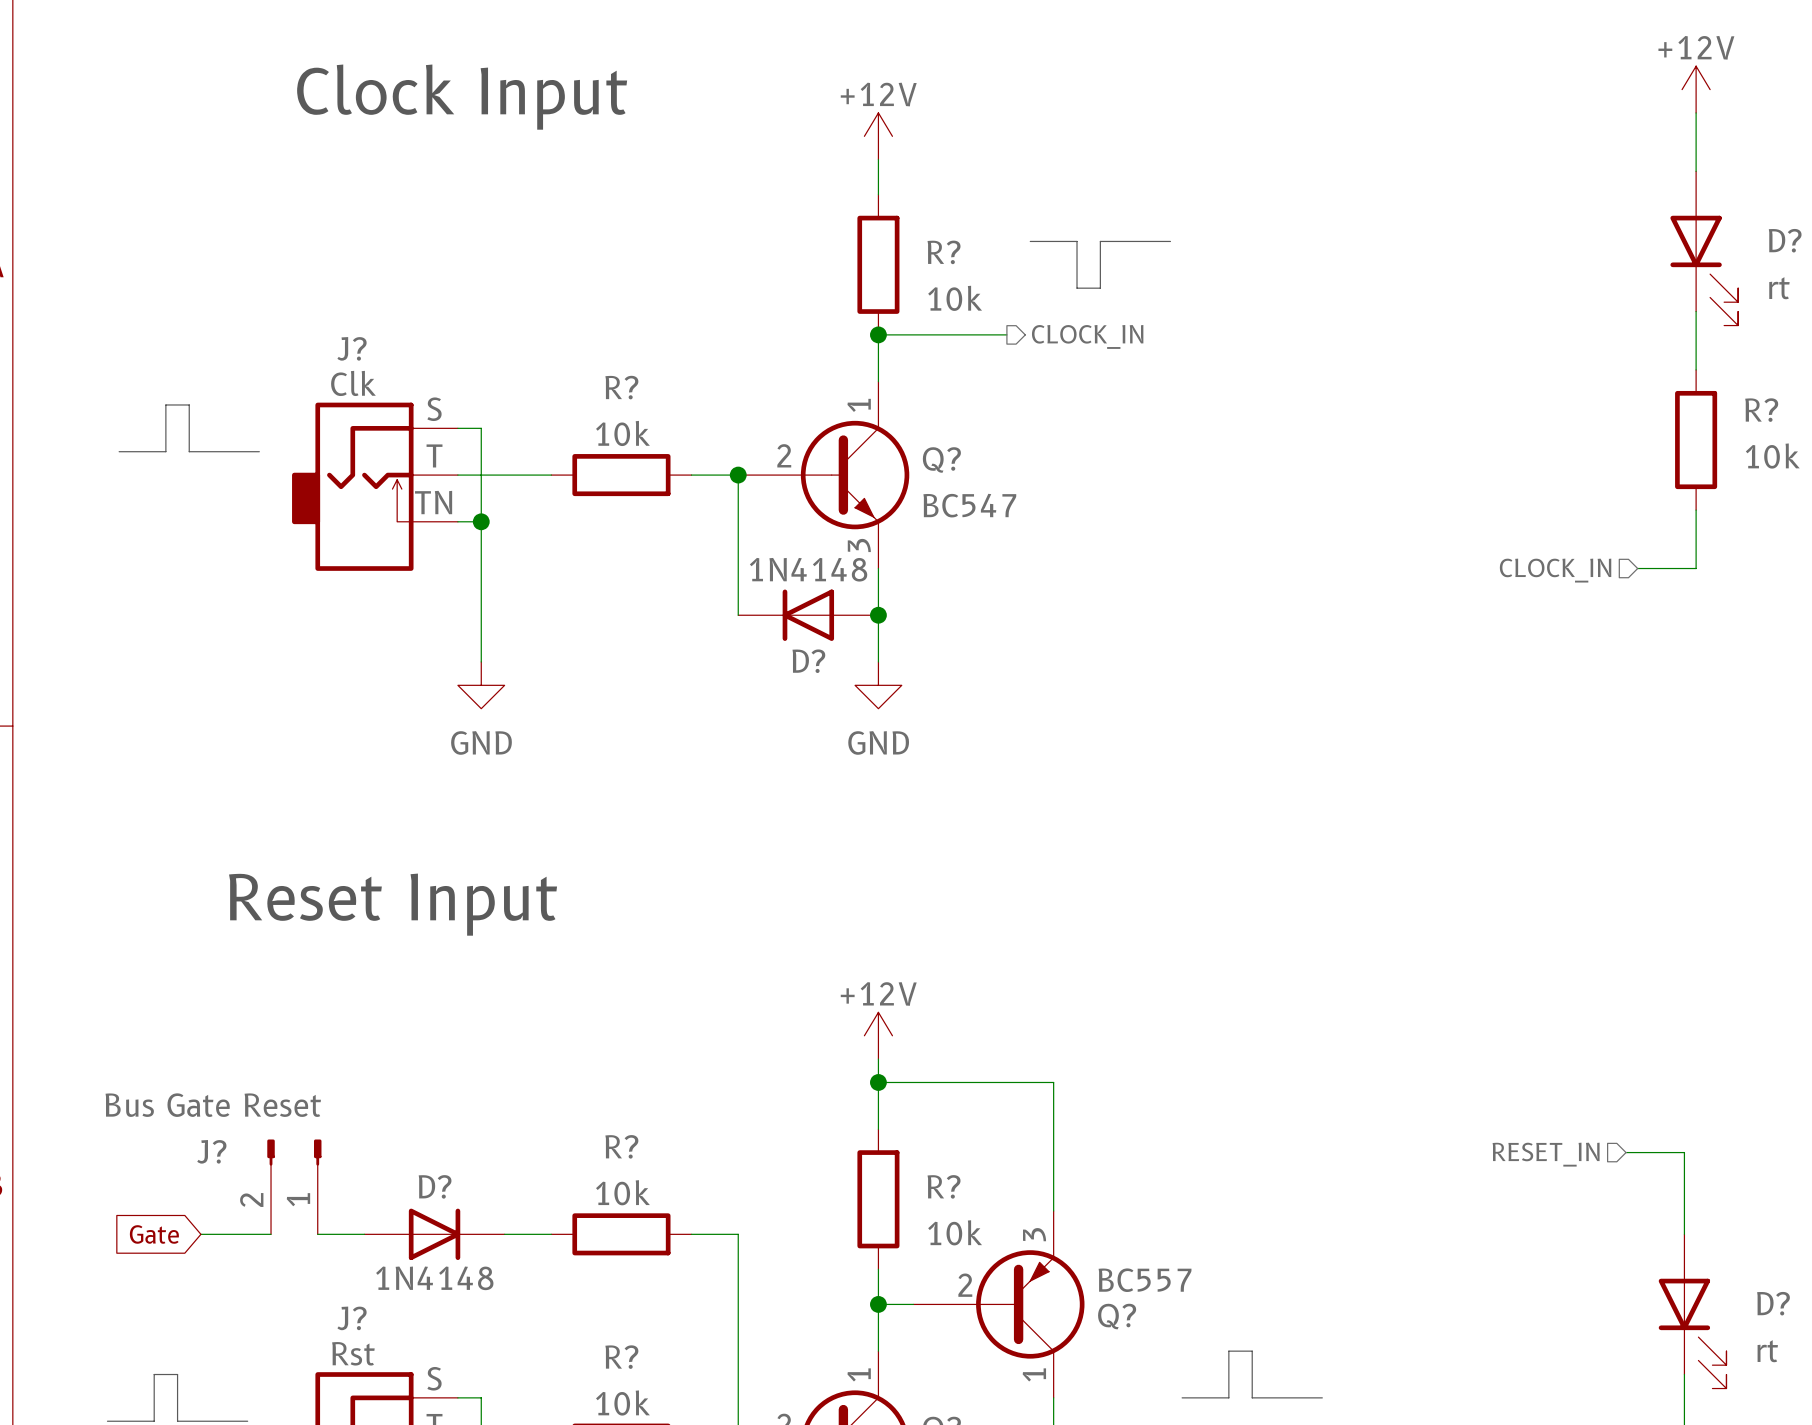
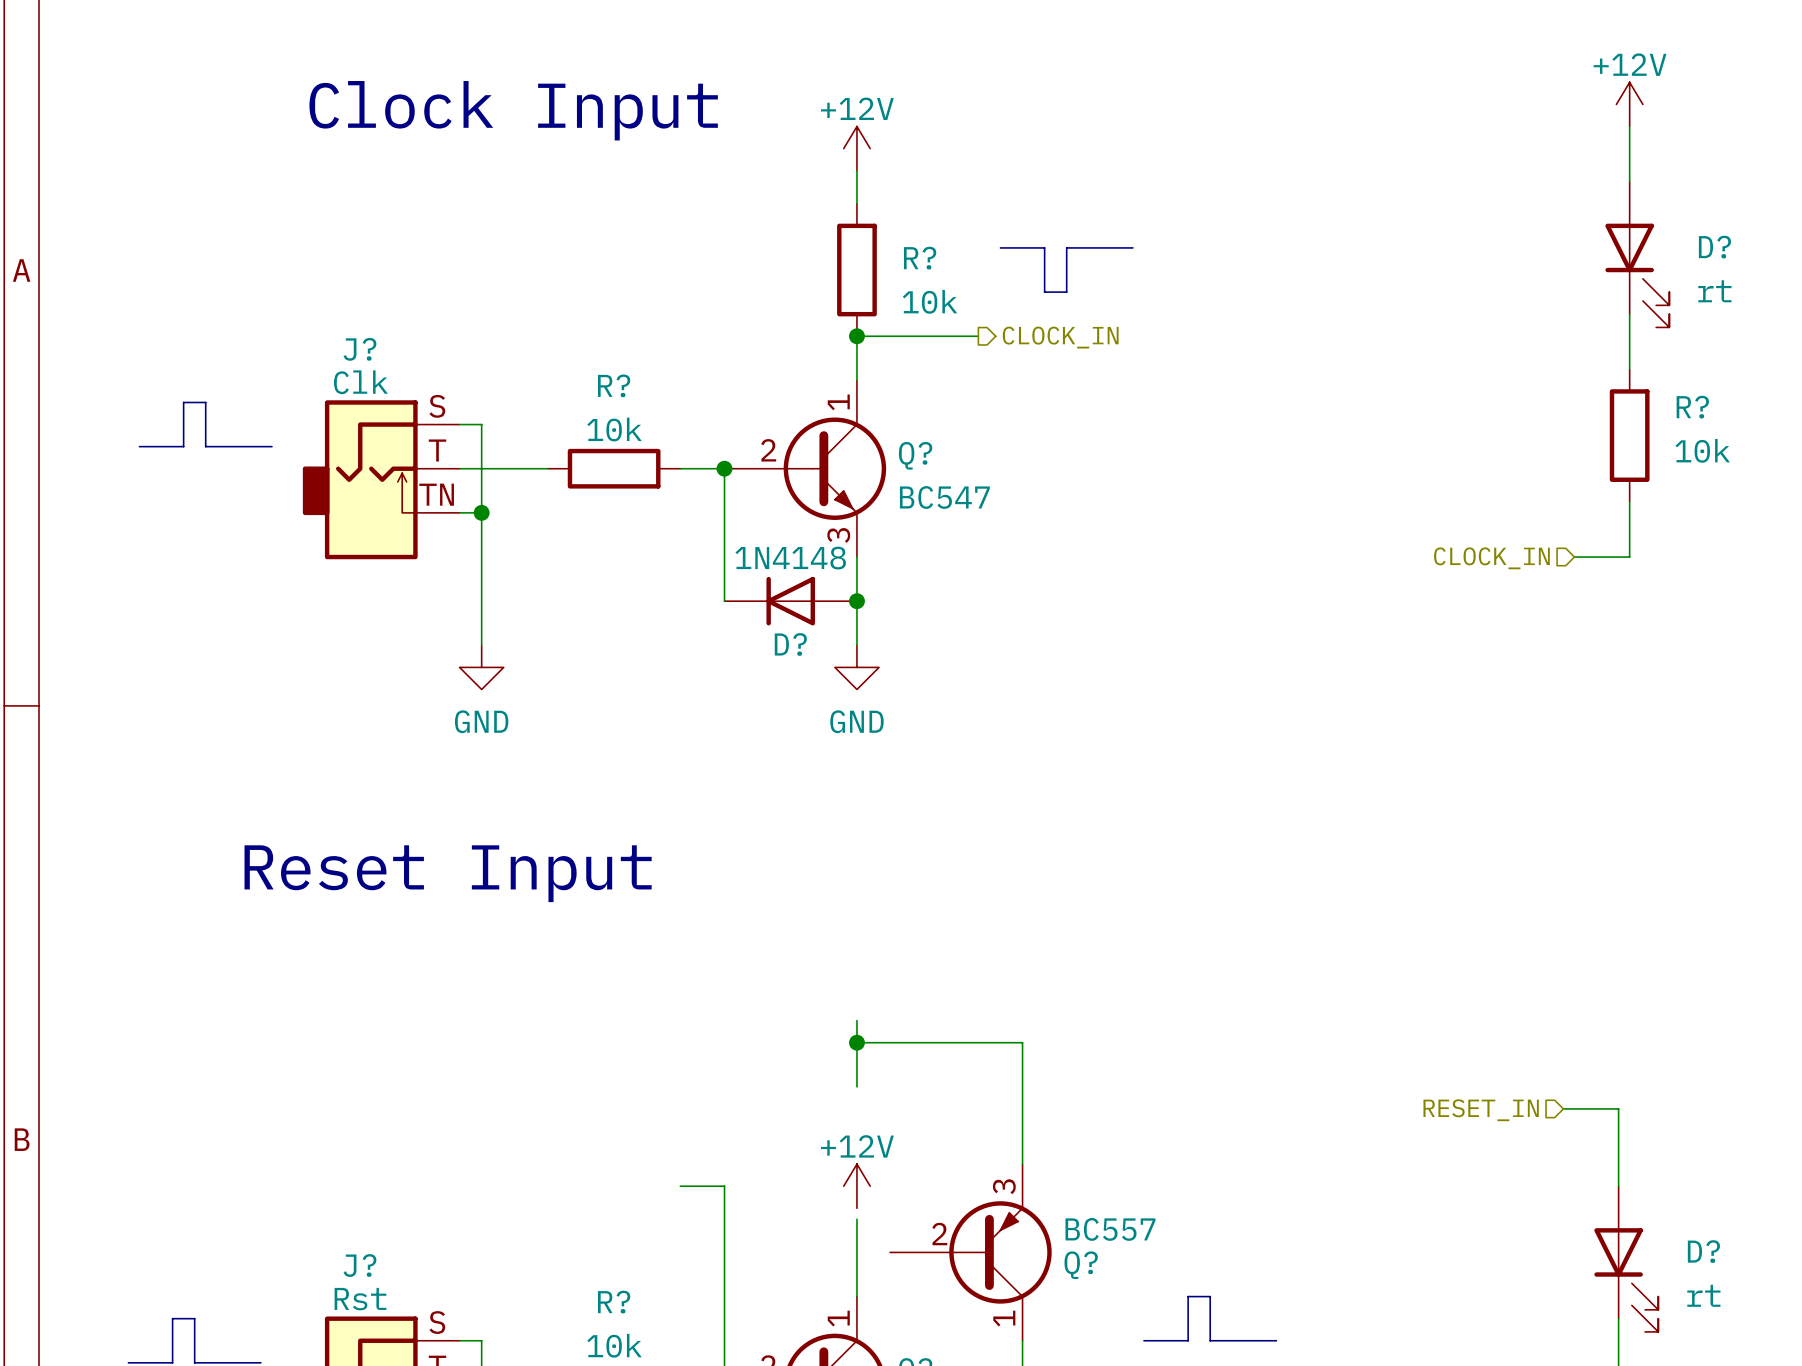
power symbol position: +12V (878, 1035) -> +12V (856, 1186)
J?: Bus Gate Reset (294, 1186) -> none
R?: 10k (878, 1199) -> none
global label: Gate (154, 1234) -> none
wire: (200, 1234) (271, 1234) -> none
wire: (317, 1234) (364, 1234) -> none
D?: 1N4148 (434, 1234) -> none
wire: (504, 1234) (551, 1234) -> none
R?: 10k (621, 1234) -> none
wire: (878, 1304) (913, 1304) -> none
junction: (878, 1304) -> none

